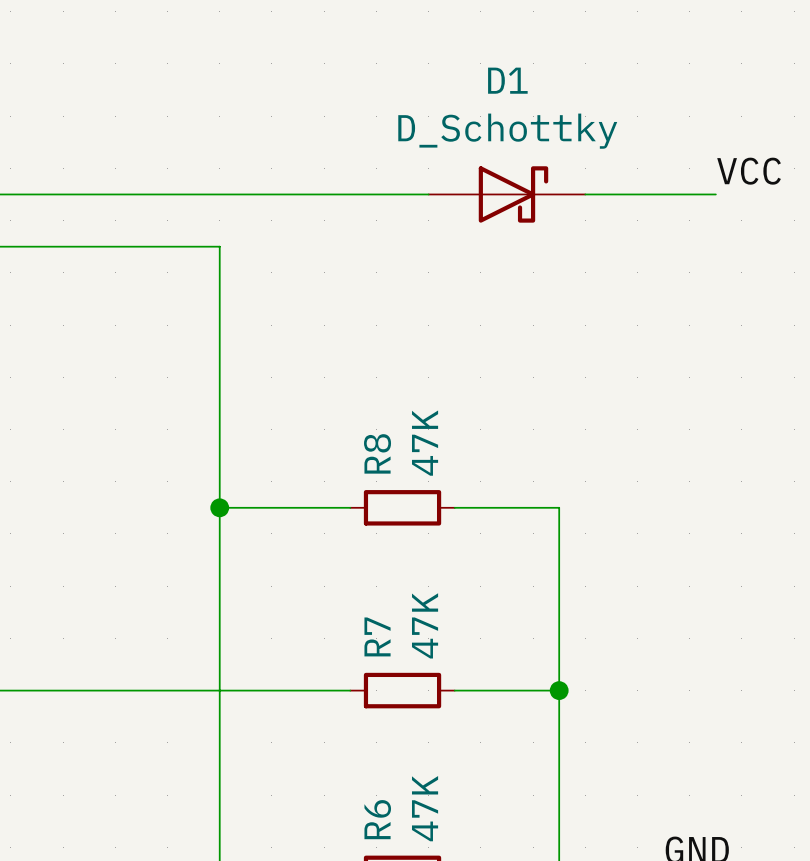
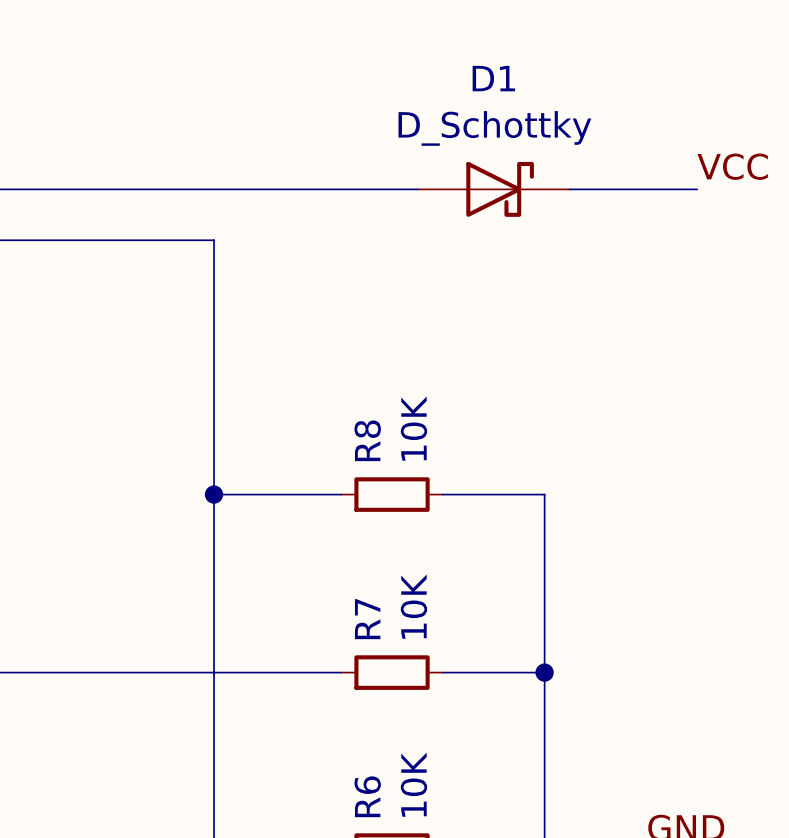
R8 value: 47K (425, 443) -> 10K (413, 428)
R7 value: 47K (425, 625) -> 10K (413, 606)
R6 value: 47K (425, 808) -> 10K (413, 784)

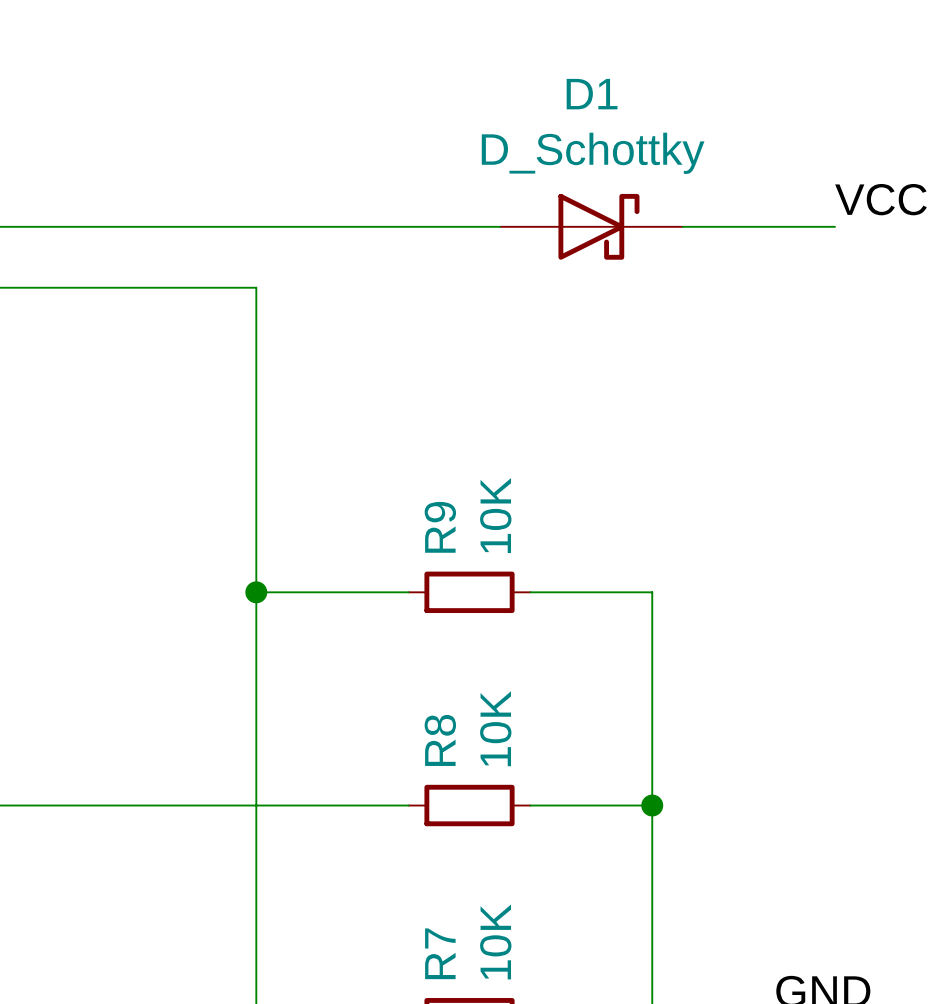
R8 name: R8 (367, 440) -> R9 (440, 527)
R7 name: R7 (367, 619) -> R8 (440, 740)
R6 name: R6 (367, 796) -> R7 (440, 953)

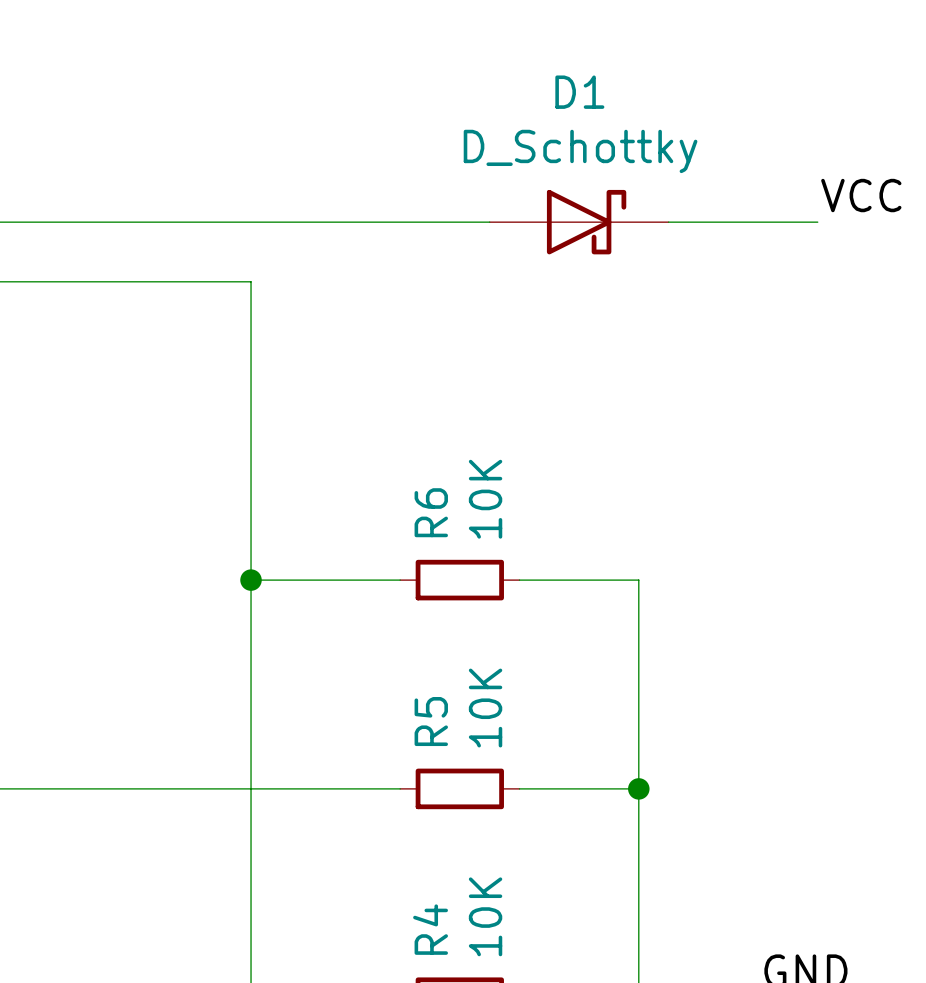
R9 name: R9 (440, 527) -> R6 (431, 512)
R8 name: R8 (440, 740) -> R5 (431, 721)
R7 name: R7 (440, 953) -> R4 (430, 929)

